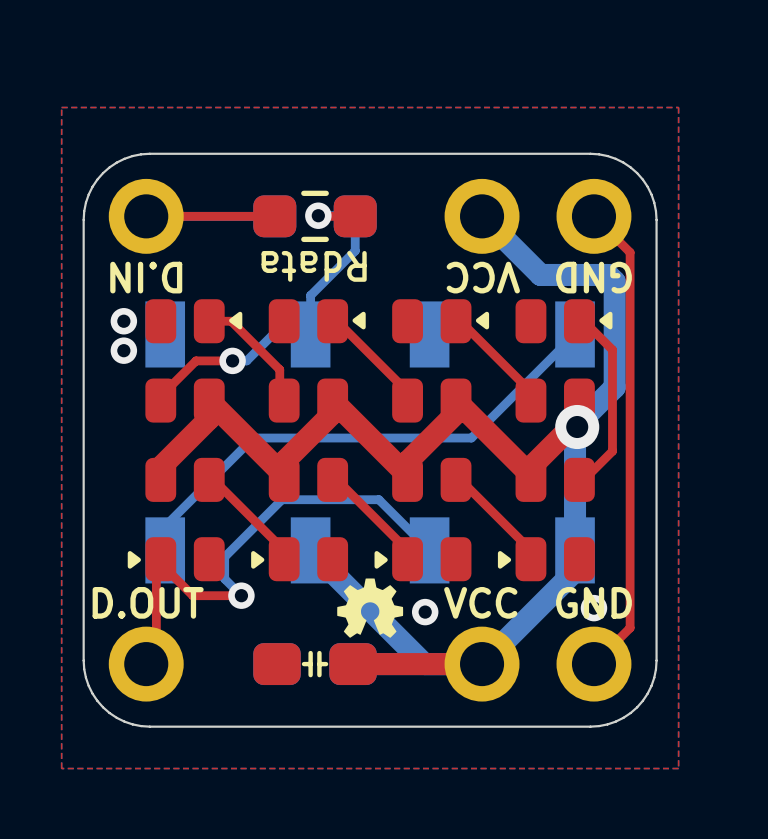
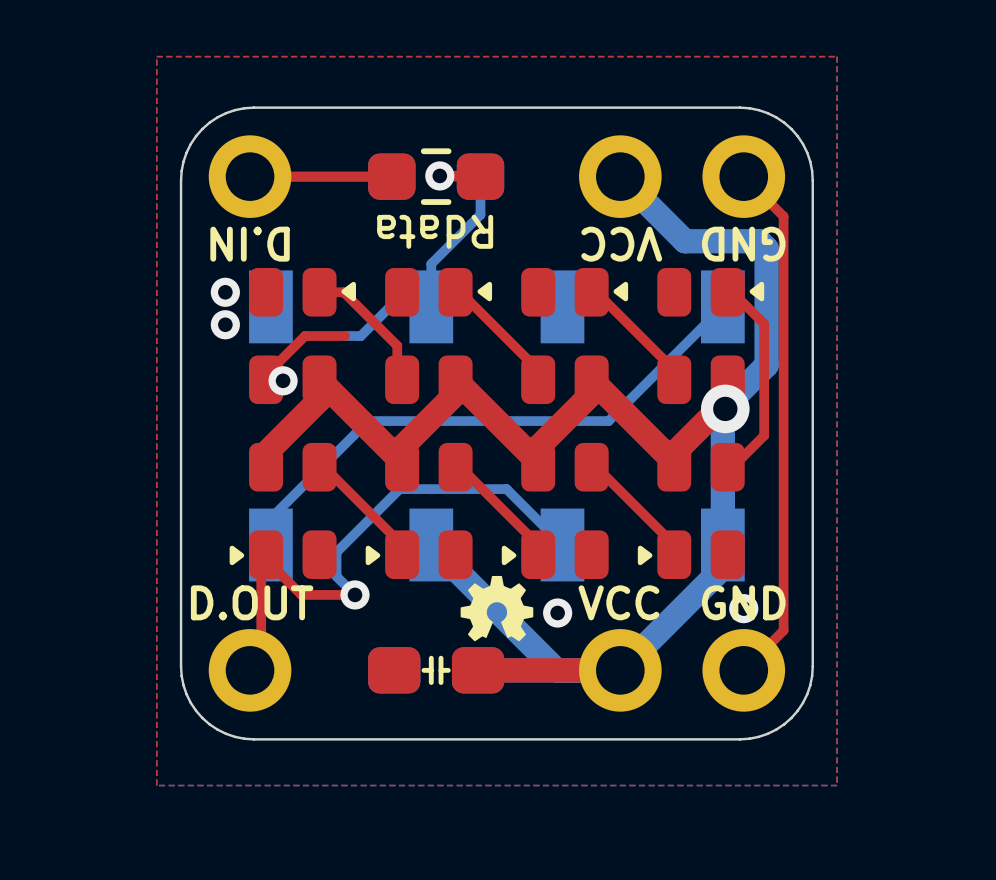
via position: (232, 360) -> (283, 380)

